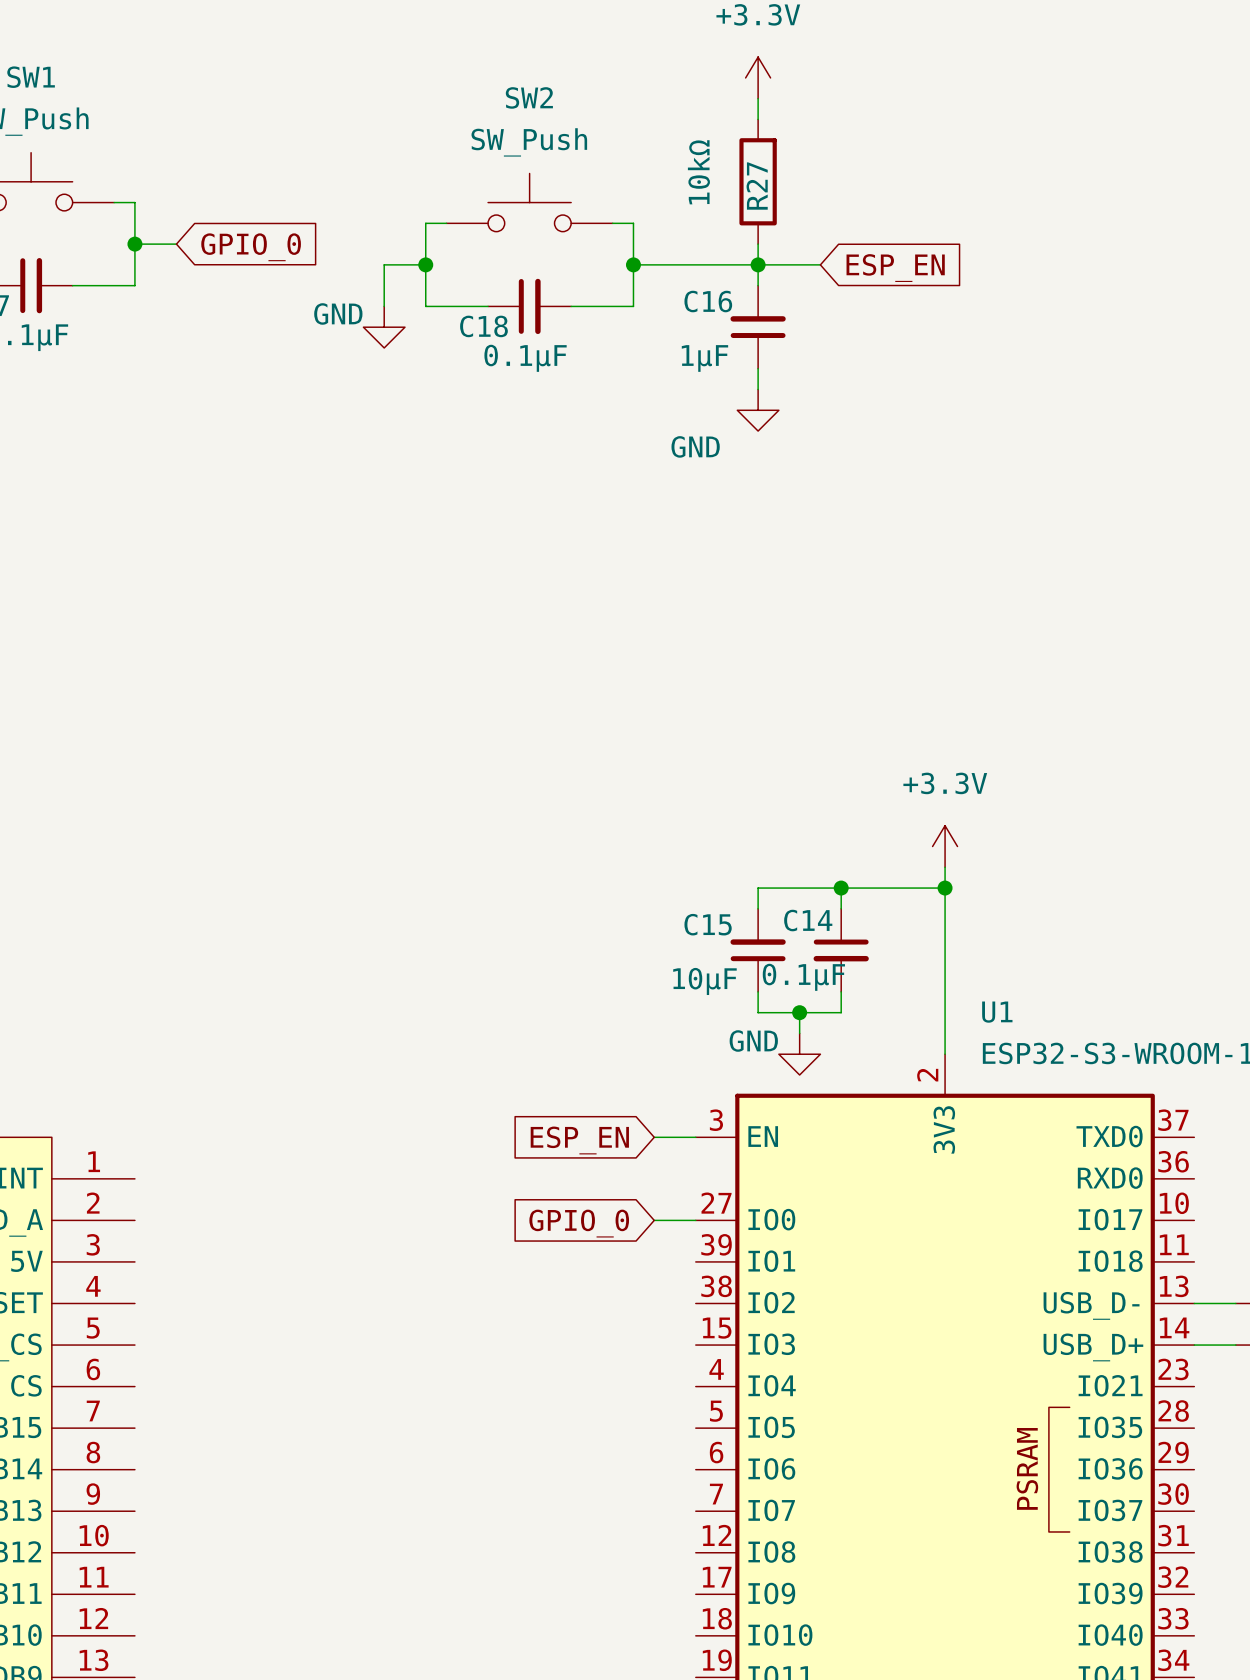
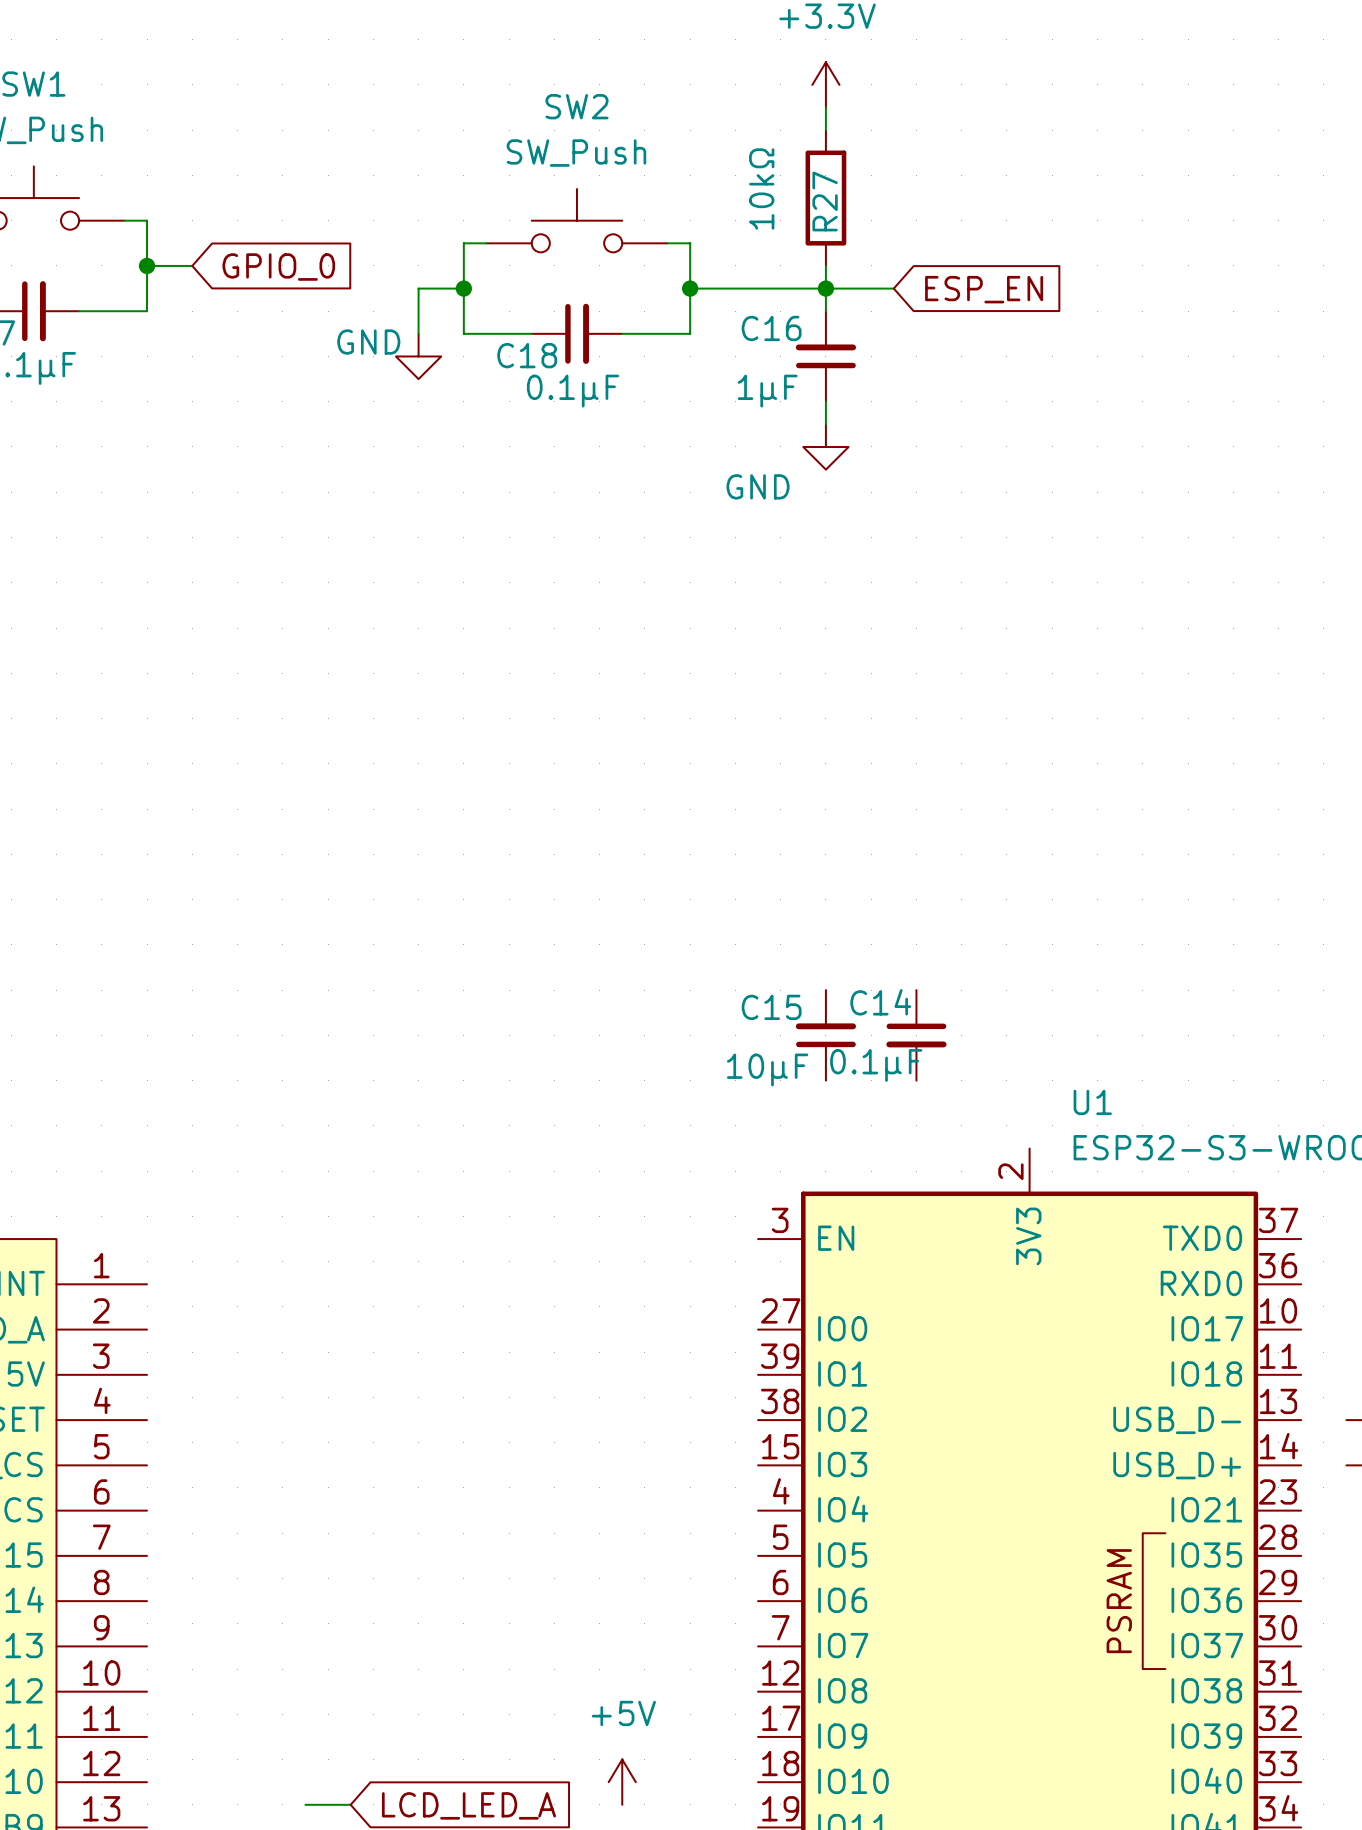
power symbol: +3.3V (945, 846) -> none
wire: (945, 867) (945, 1054) -> none
wire: (841, 888) (841, 908) -> none
junction: (841, 888) -> none
wire: (945, 888) (758, 888) (758, 908) -> none
junction: (945, 888) -> none
wire: (758, 991) (758, 1012) (841, 1012) (841, 991) -> none
wire: (799, 1012) (799, 1033) -> none
junction: (799, 1012) -> none
power symbol: GND (799, 1054) -> none
wire: (654, 1137) (695, 1137) -> none
global label: ESP_EN (579, 1140) -> none
wire: (654, 1220) (695, 1220) -> none
global label: GPIO_0 (579, 1223) -> none
wire: (1194, 1303) (1235, 1303) -> none
wire: (1194, 1345) (1235, 1345) -> none
power symbol: none -> +5V (622, 1782)
wire: none -> (305, 1804) (350, 1804)
global label: none -> LCD_LED_A (468, 1805)

